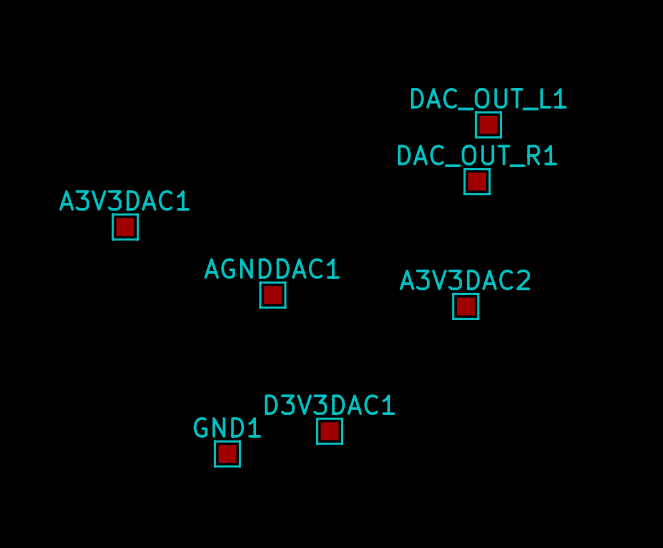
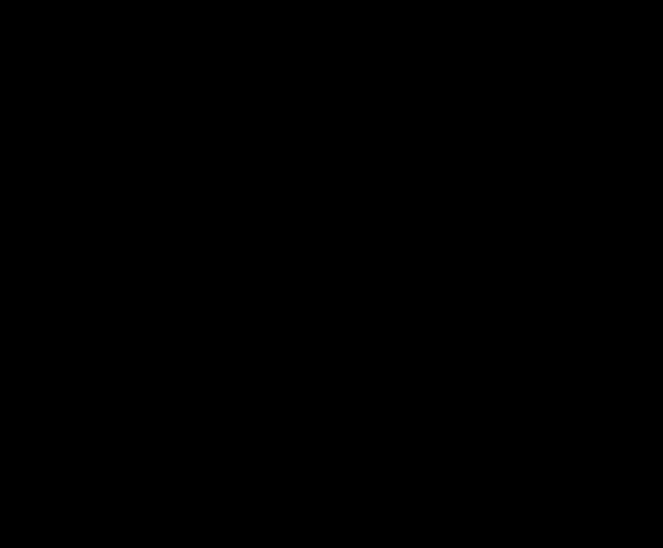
DAC_OUT_L1: (488, 124) -> none
DAC_OUT_R1: (477, 181) -> none
A3V3DAC1: (125, 226) -> none
AGNDDAC1: (272, 295) -> none
A3V3DAC2: (465, 306) -> none
D3V3DAC1: (329, 431) -> none
GND1: (227, 453) -> none

